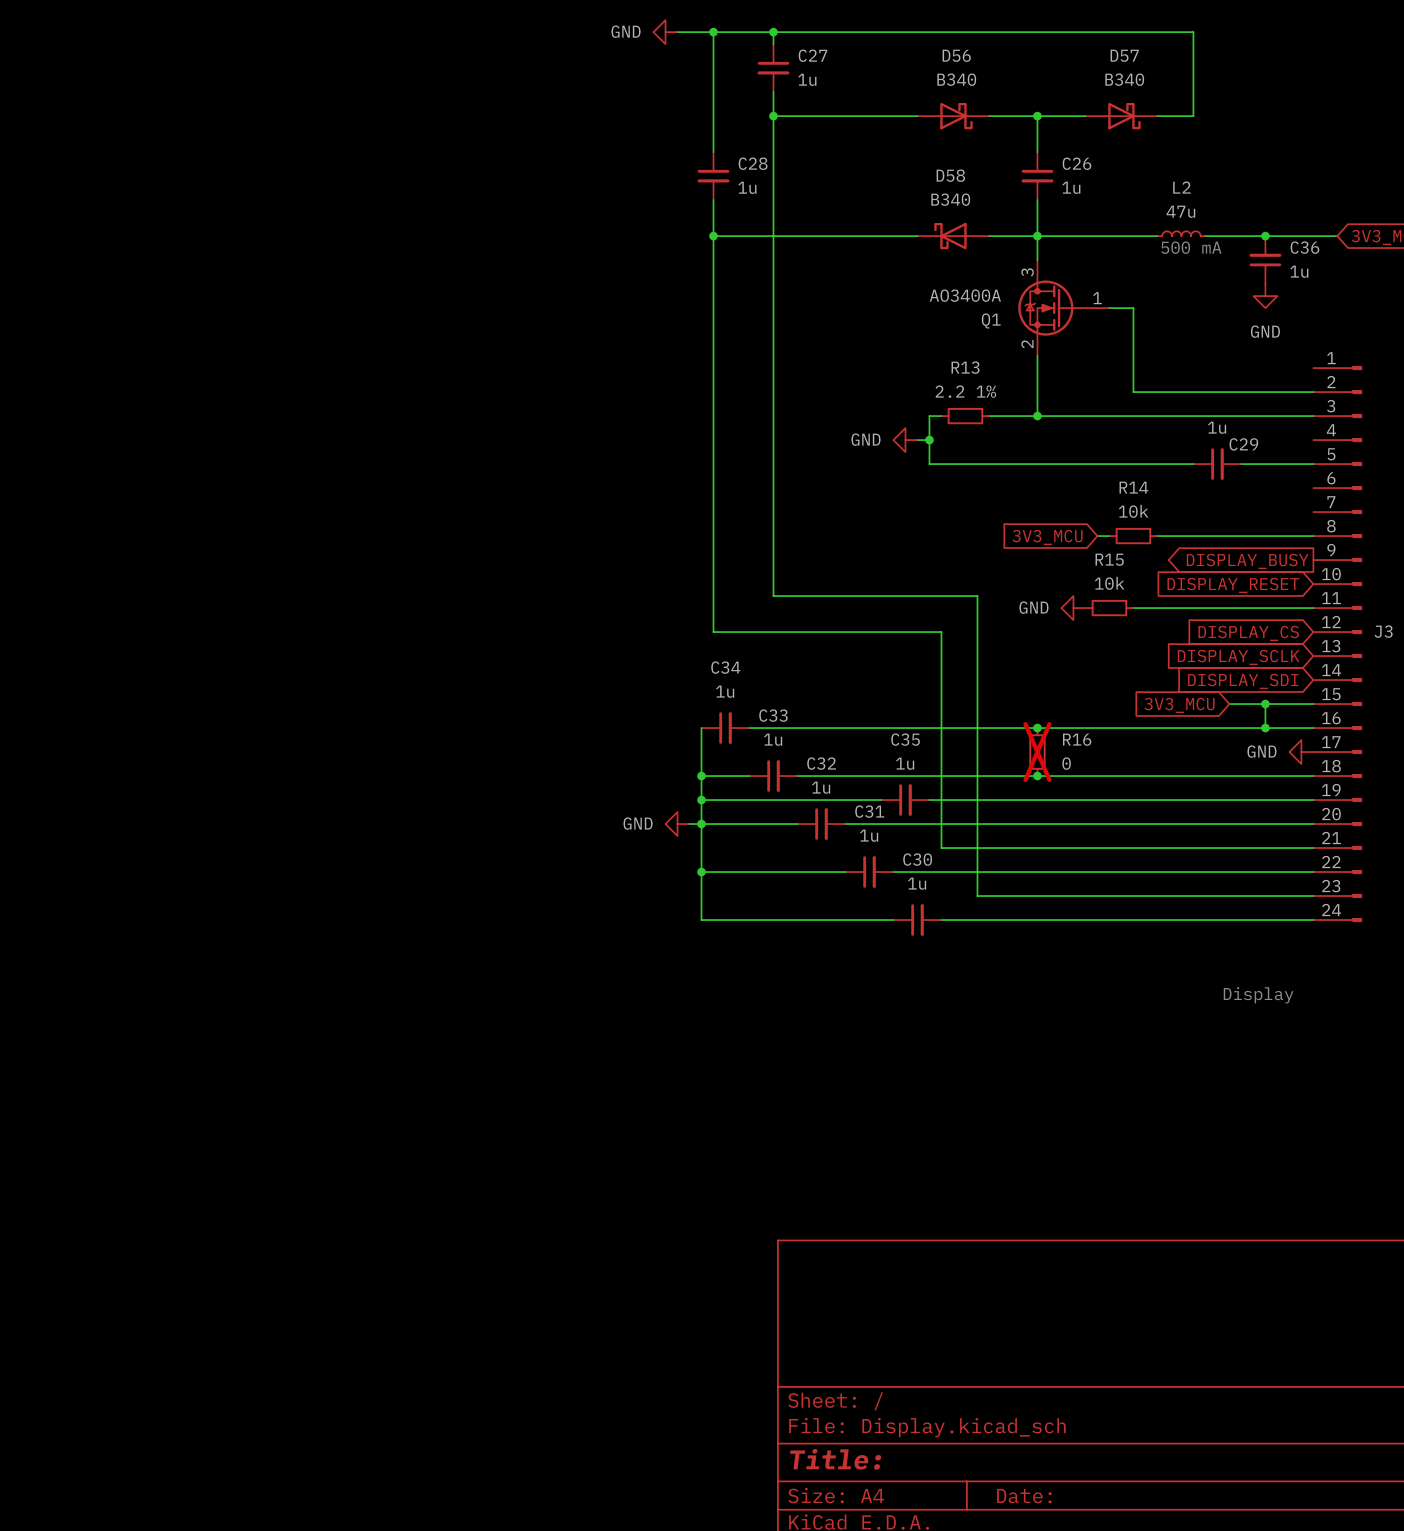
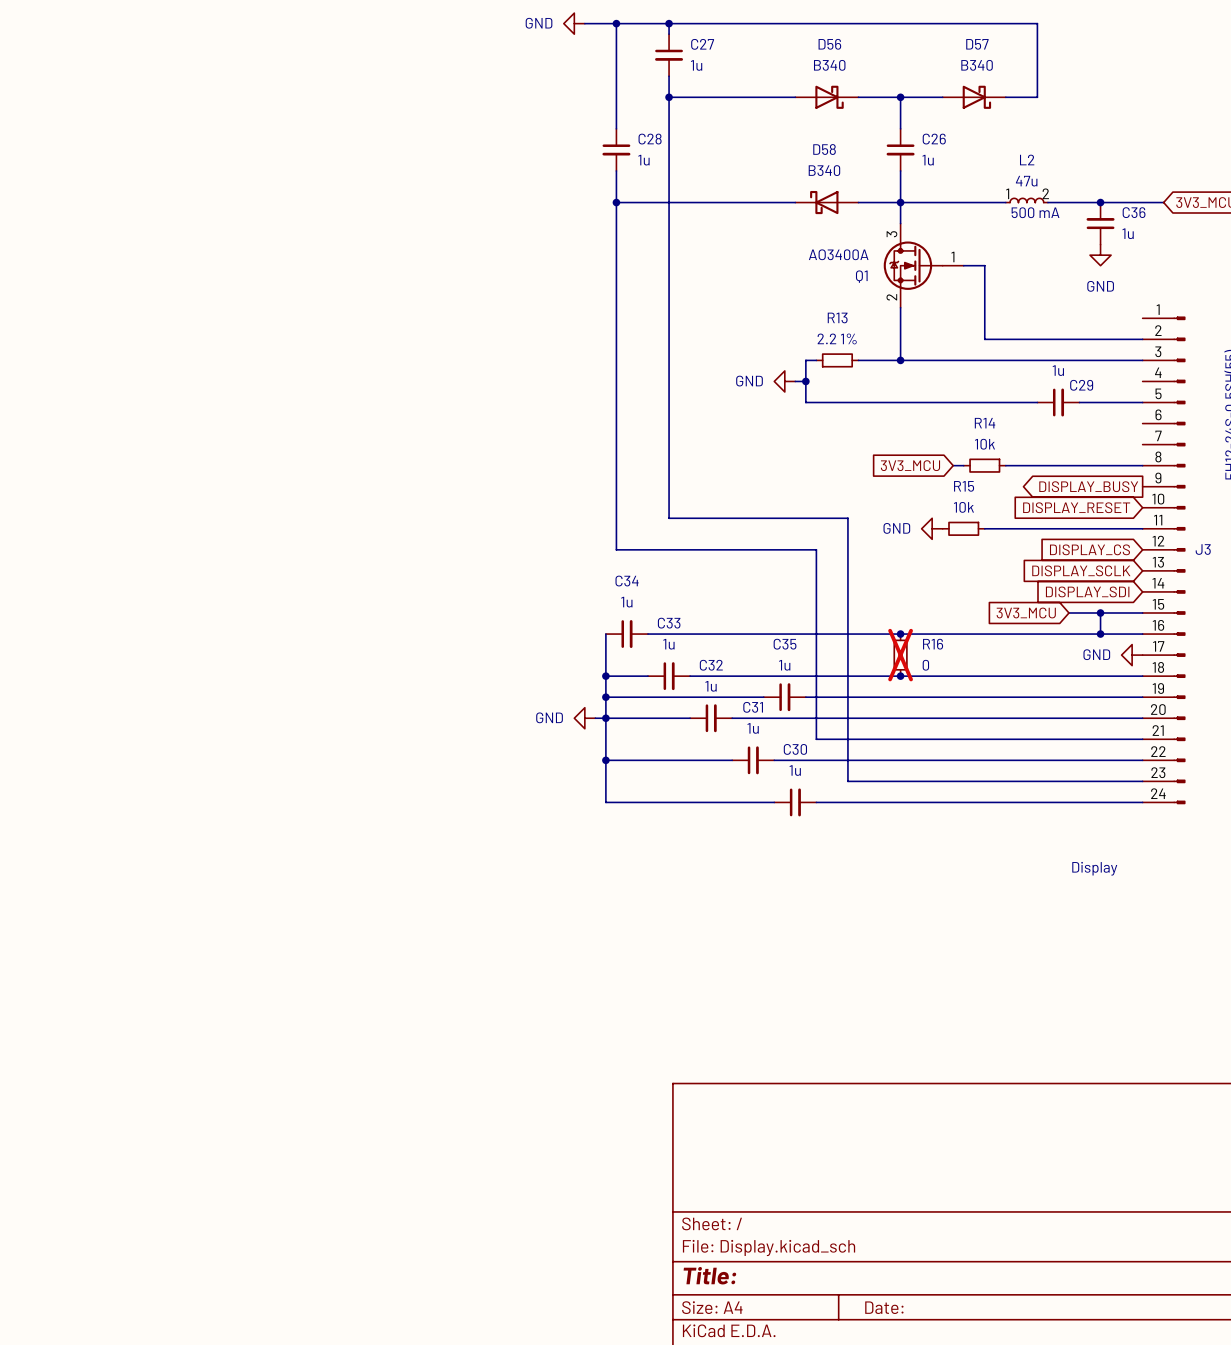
L2 pin number: none -> 1 (1007, 193)
L2 pin number: none -> 2 (1045, 193)

